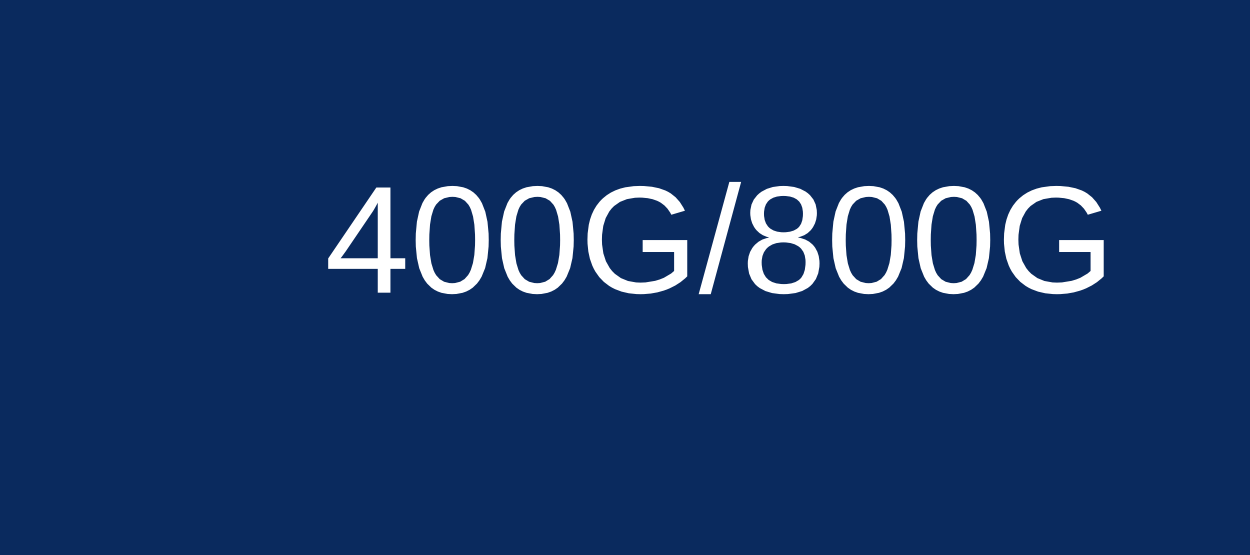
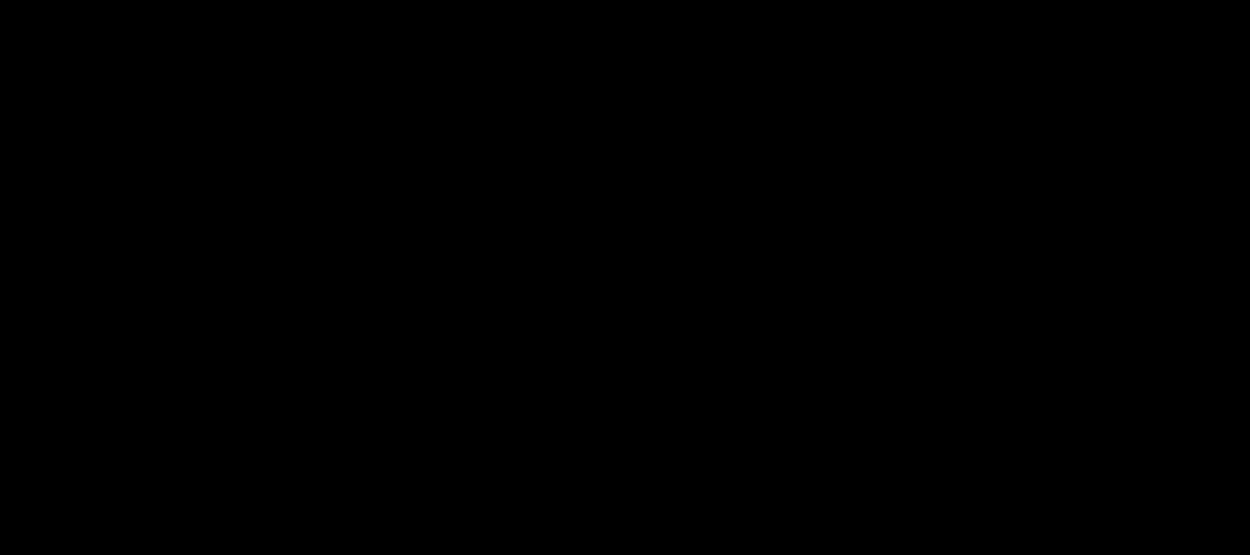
text: 400G/800G (715, 238) -> none

